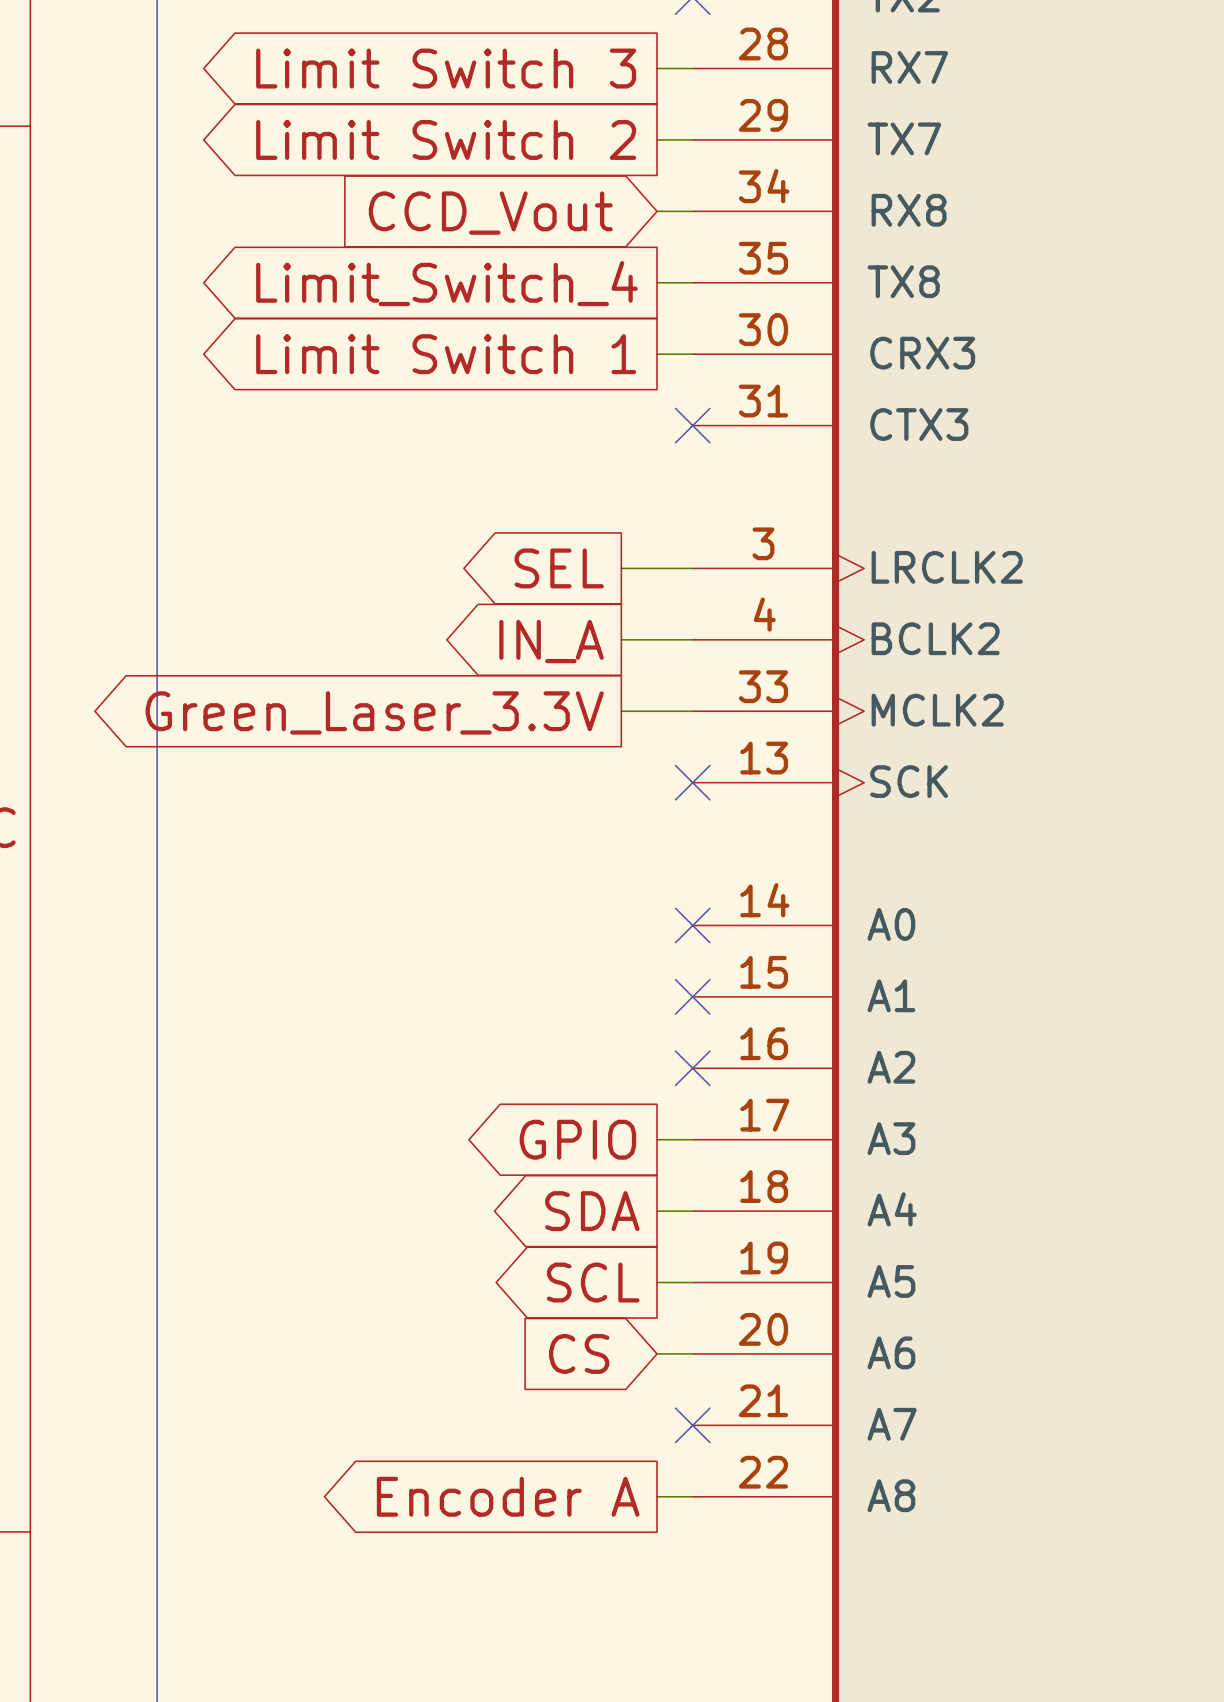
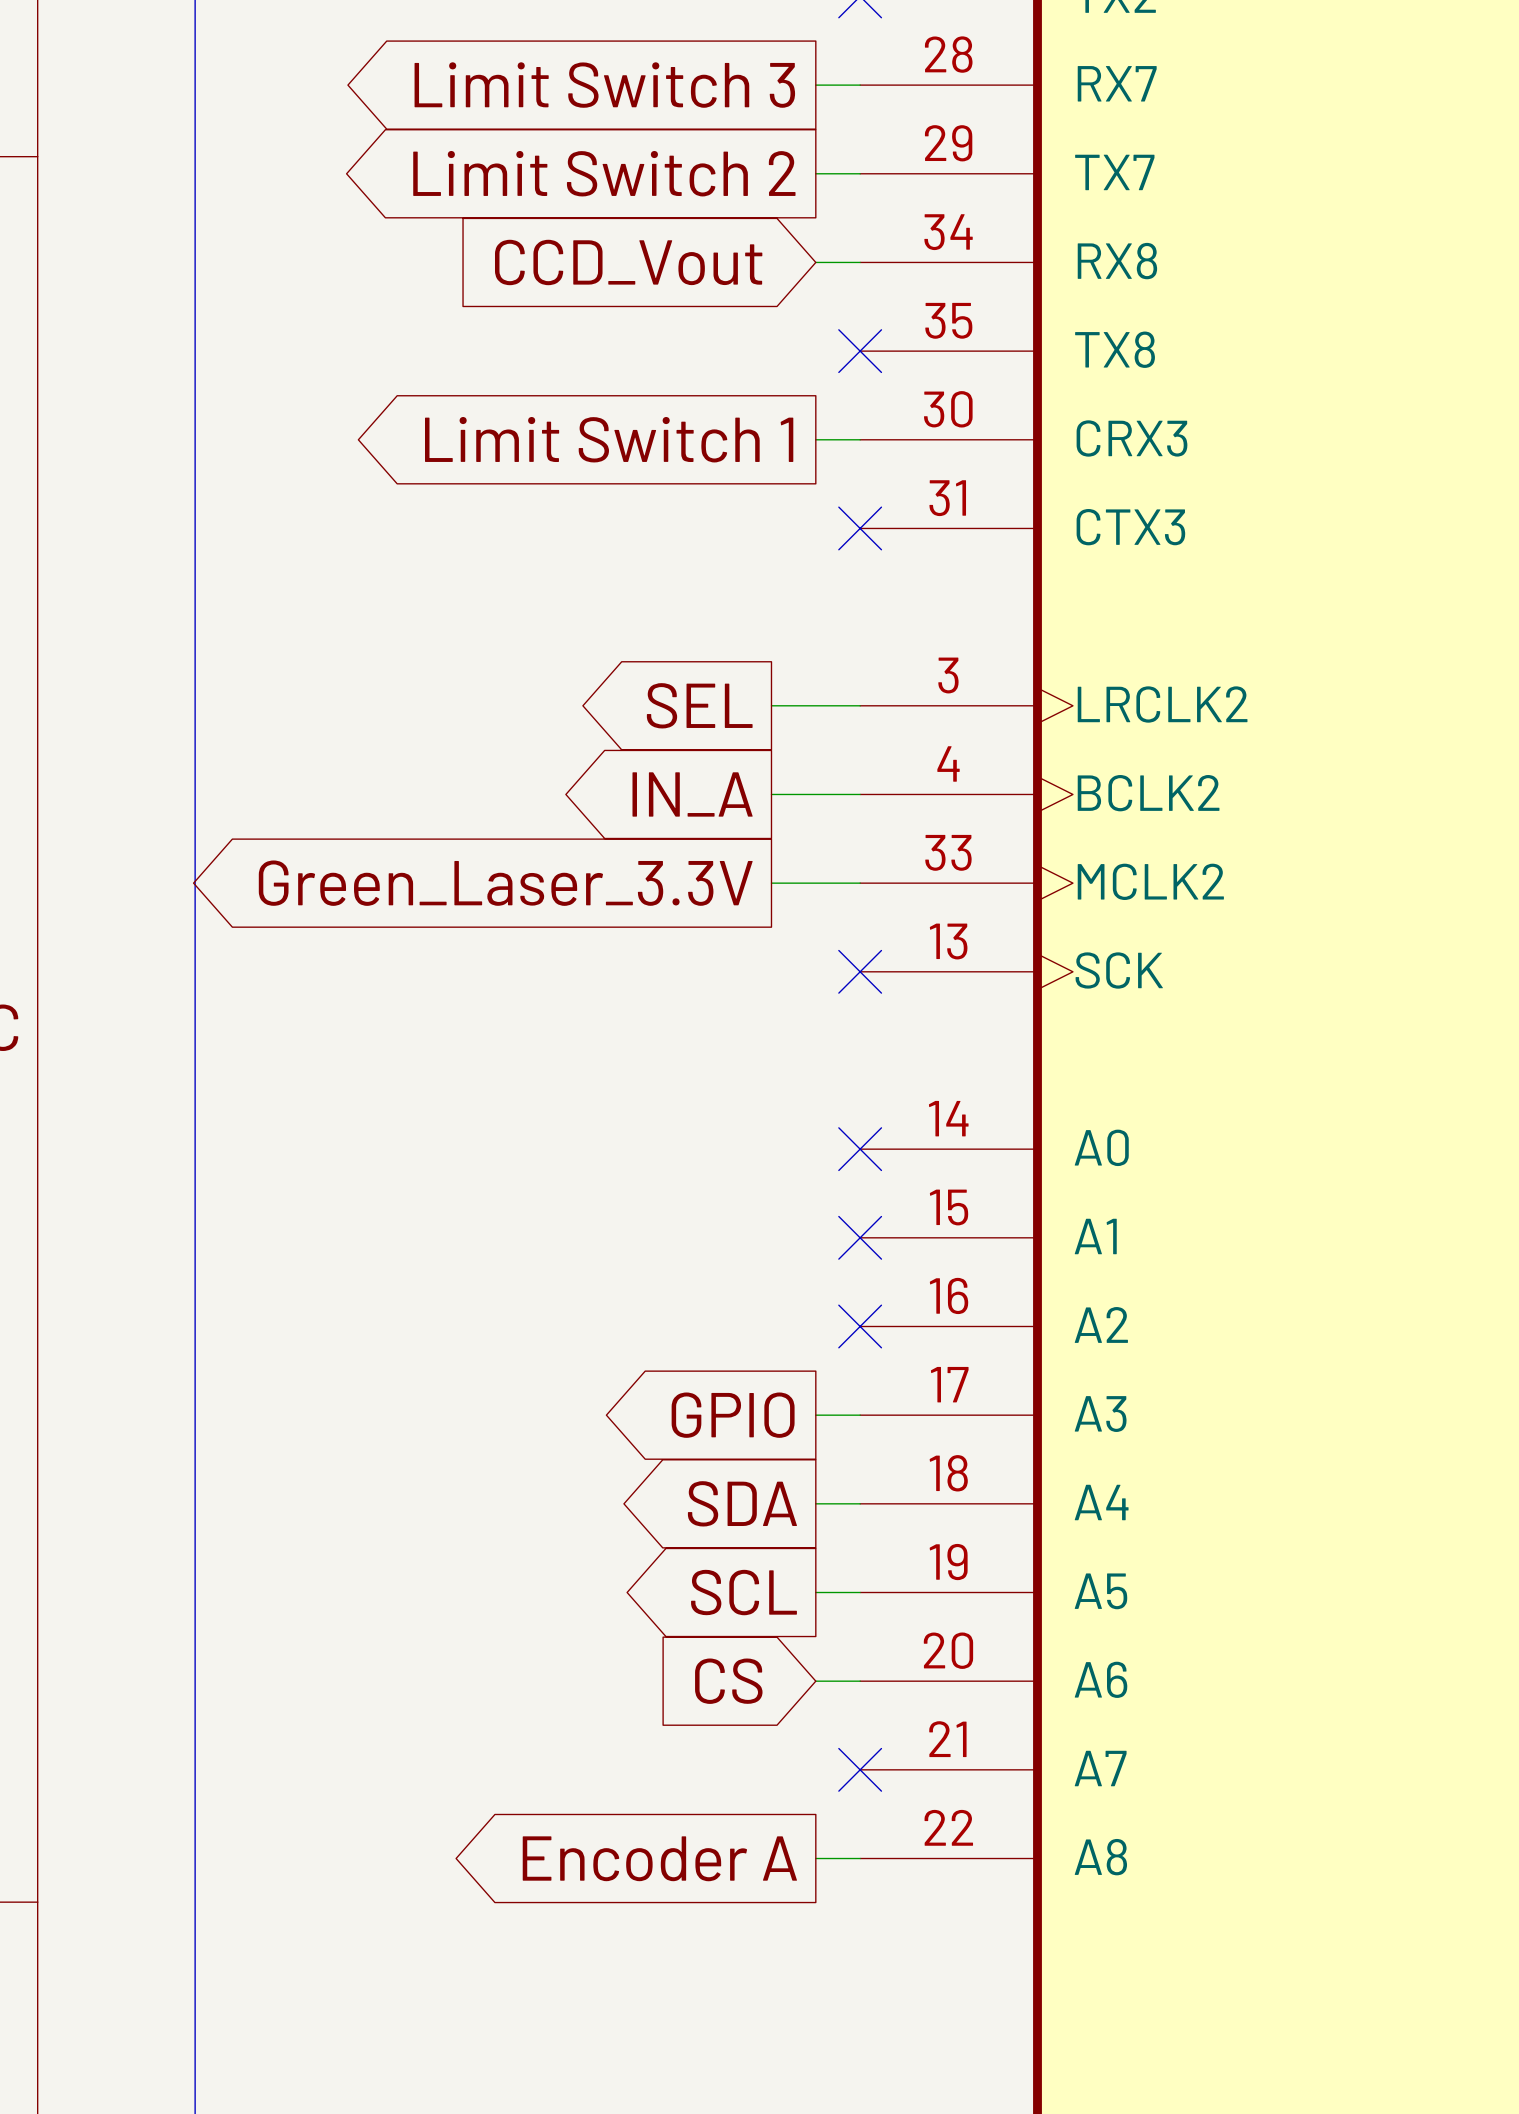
wire: (657, 282) (692, 282) -> none
no-connect mark: none -> (860, 351)
global label: Limit_Switch_4 (446, 283) -> none

